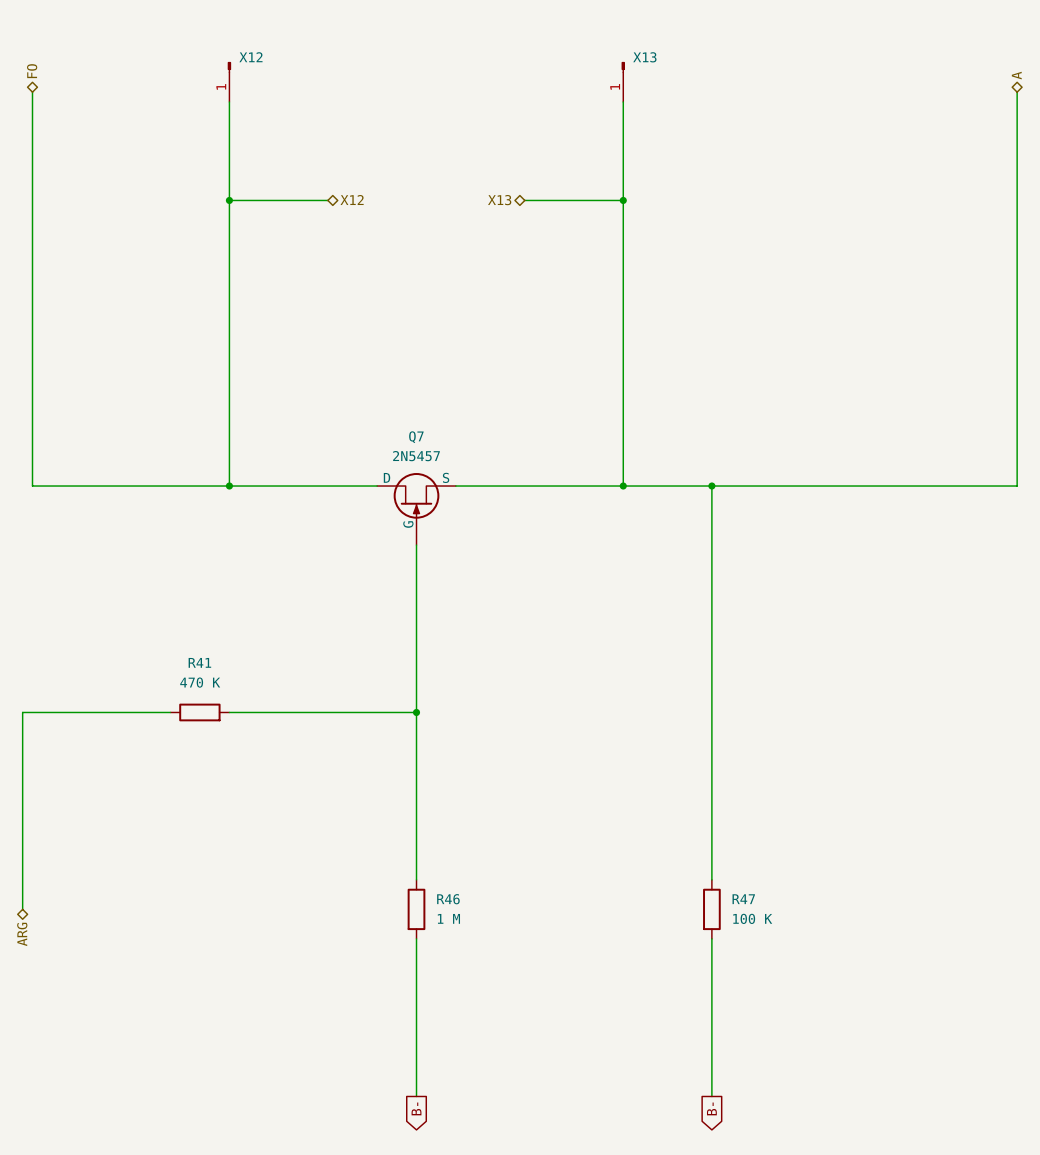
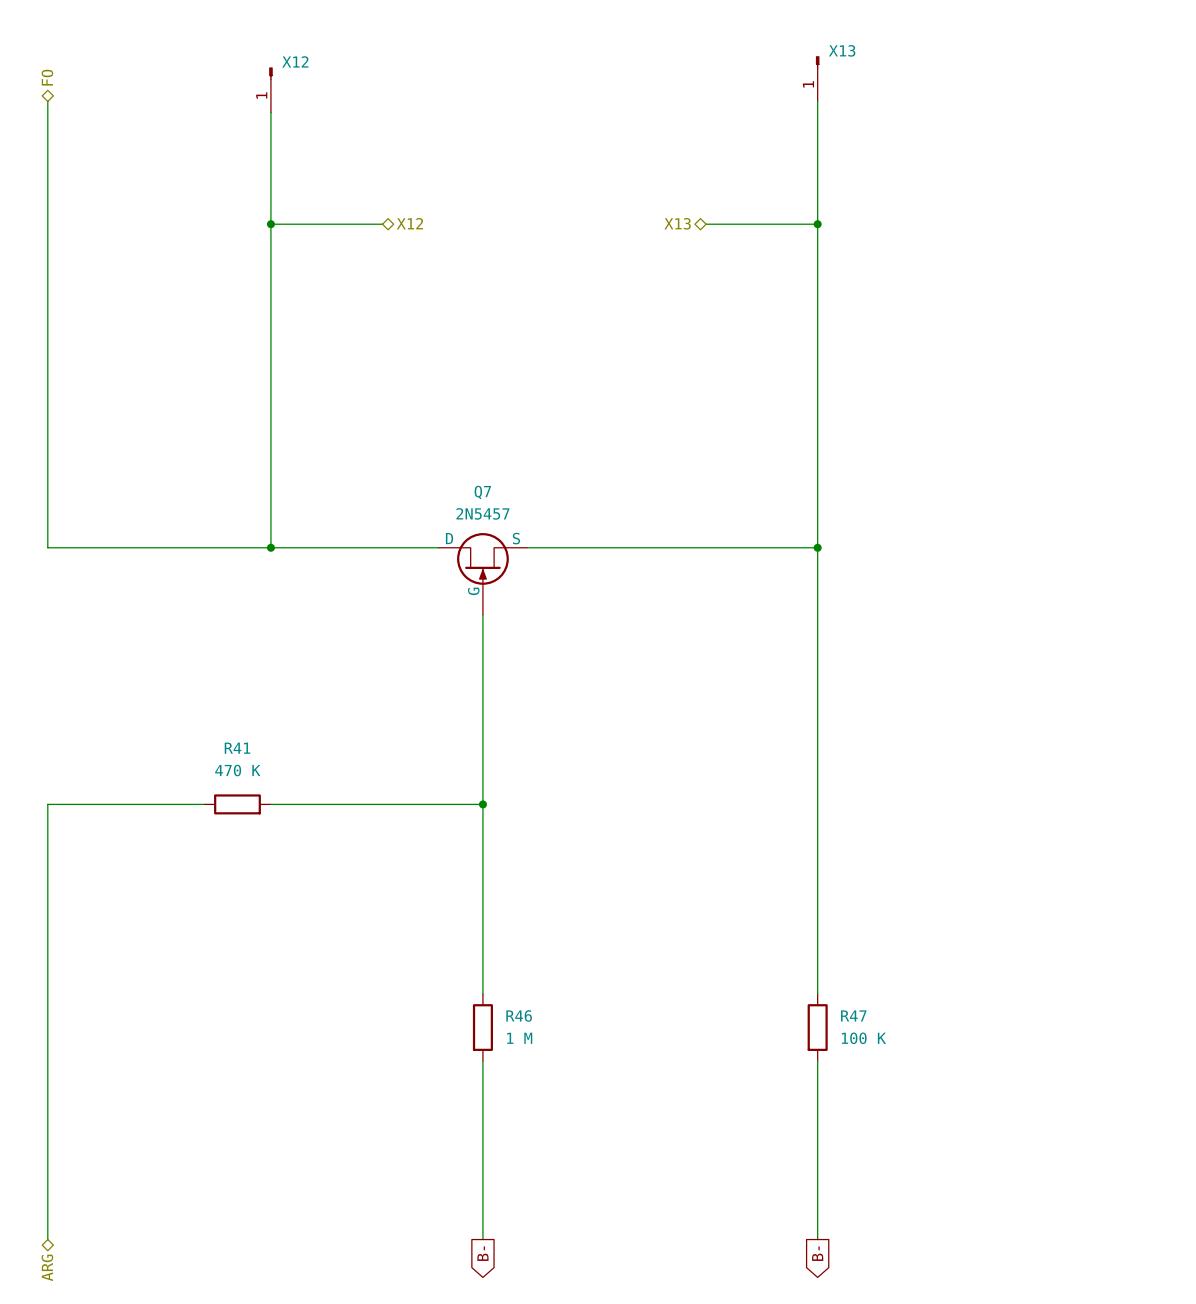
hierarchical label: A (1016, 75) -> none
X13 position: (623, 82) -> (817, 78)
wire: (1017, 92) (1017, 486) (711, 486) -> (817, 101) (817, 547)
wire: (623, 102) (623, 486) -> none
hierarchical label position: X13 (499, 200) -> X13 (677, 223)
wire: (524, 200) (613, 200) -> (717, 224) (817, 224)
junction: (623, 200) -> none
junction: none -> (817, 224)
junction: (623, 486) -> none
wire: (32, 712) (22, 712) (22, 909) -> (47, 804) (47, 1239)
hierarchical label position: ARG (22, 934) -> ARG (47, 1267)

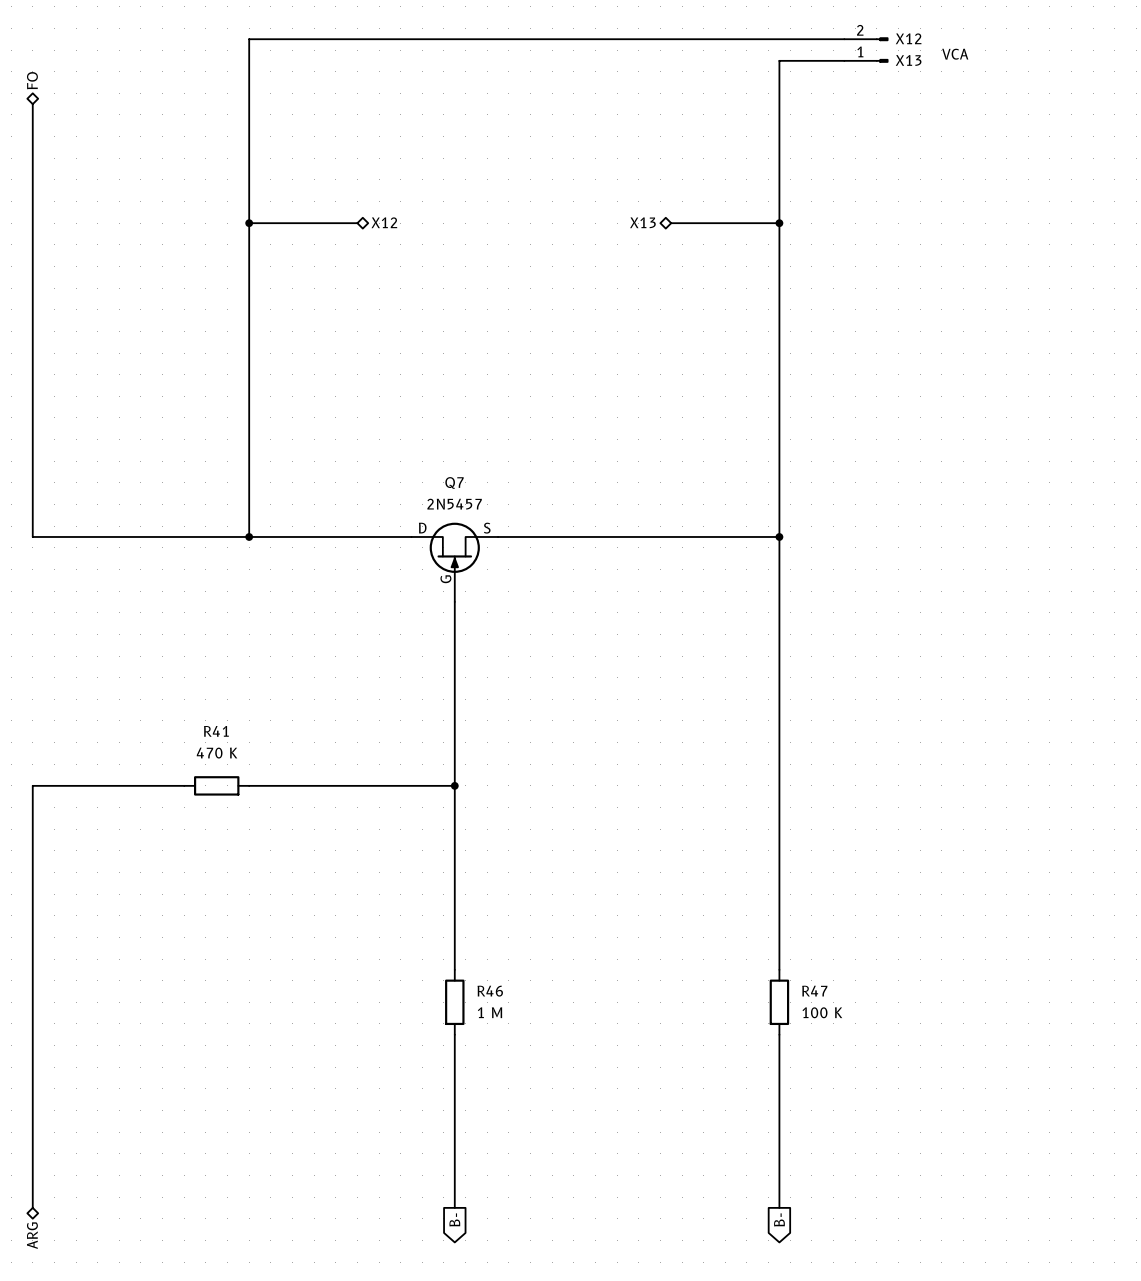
wire: none -> (844, 39) (249, 39) (249, 114)
part: none -> VCA (866, 50)
wire: none -> (844, 60) (779, 60) (779, 104)
X13: (817, 78) -> none
X12: (270, 89) -> none

